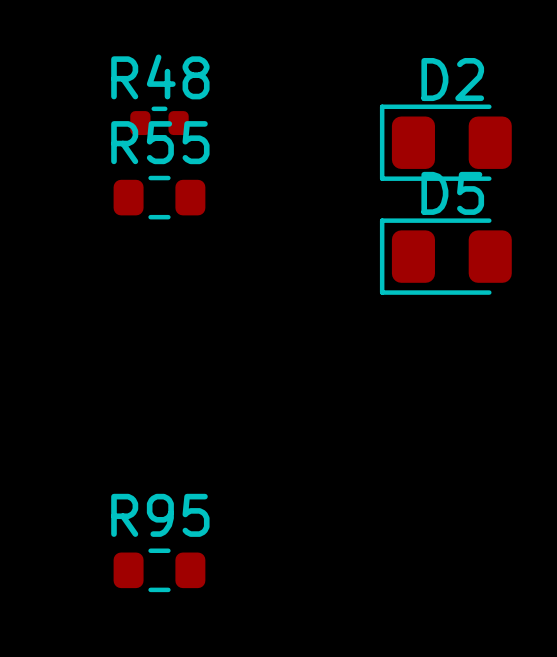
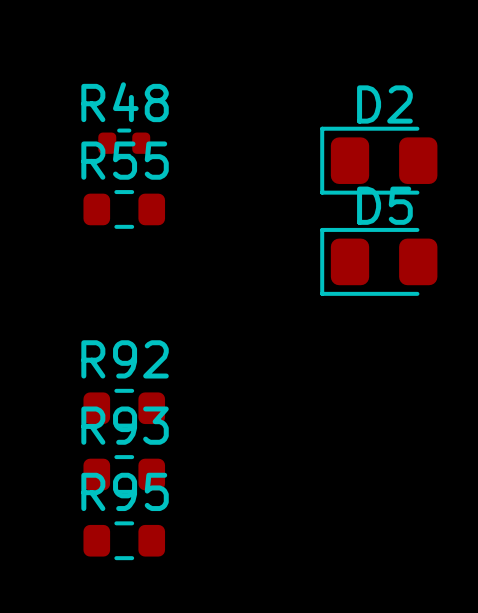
R92: none -> (124, 408)
R93: none -> (124, 474)

